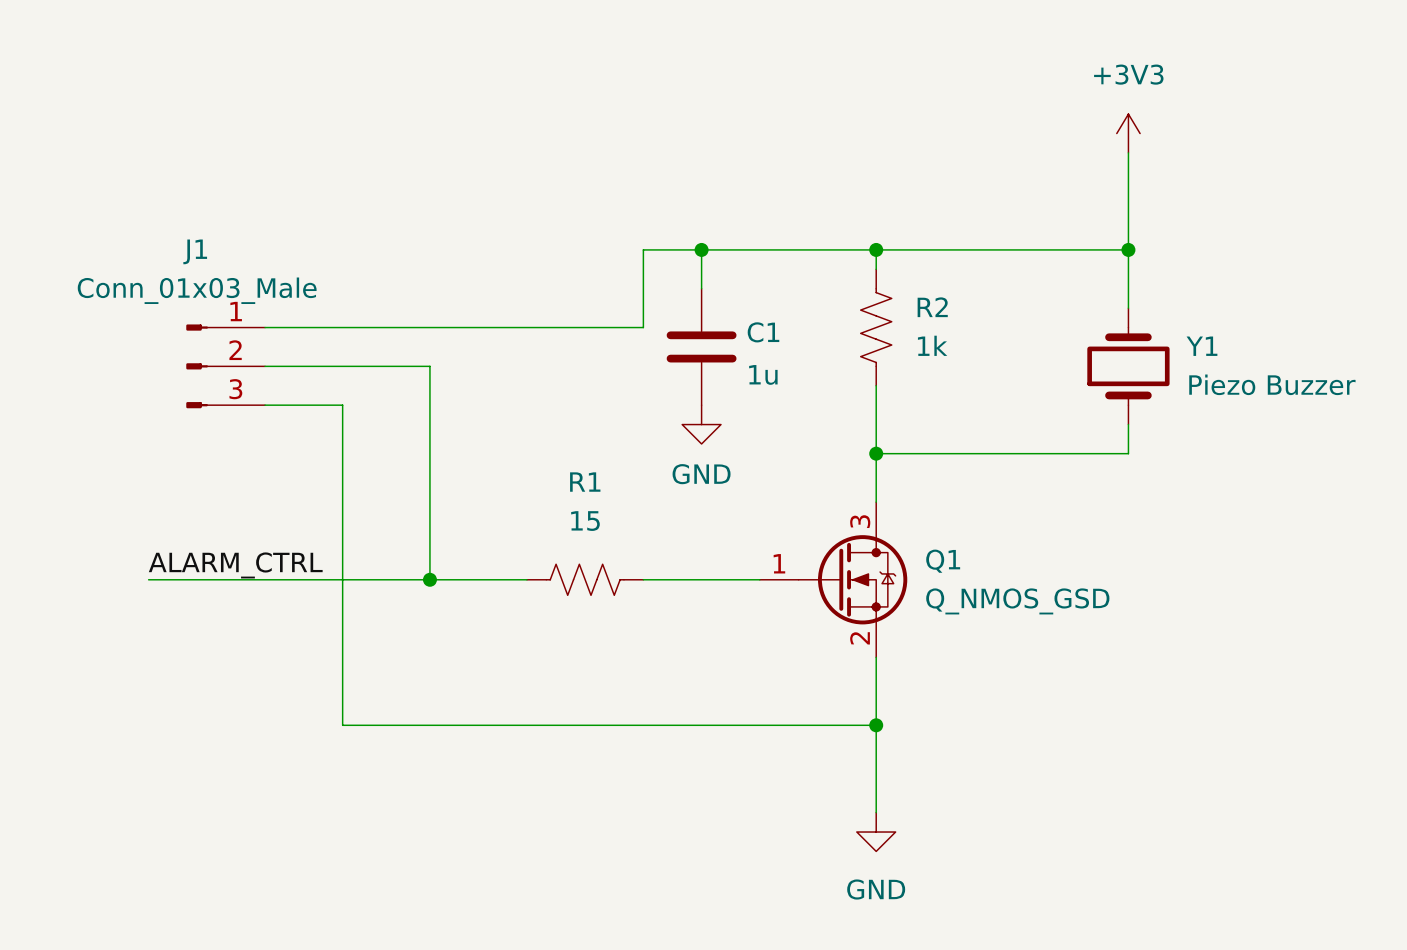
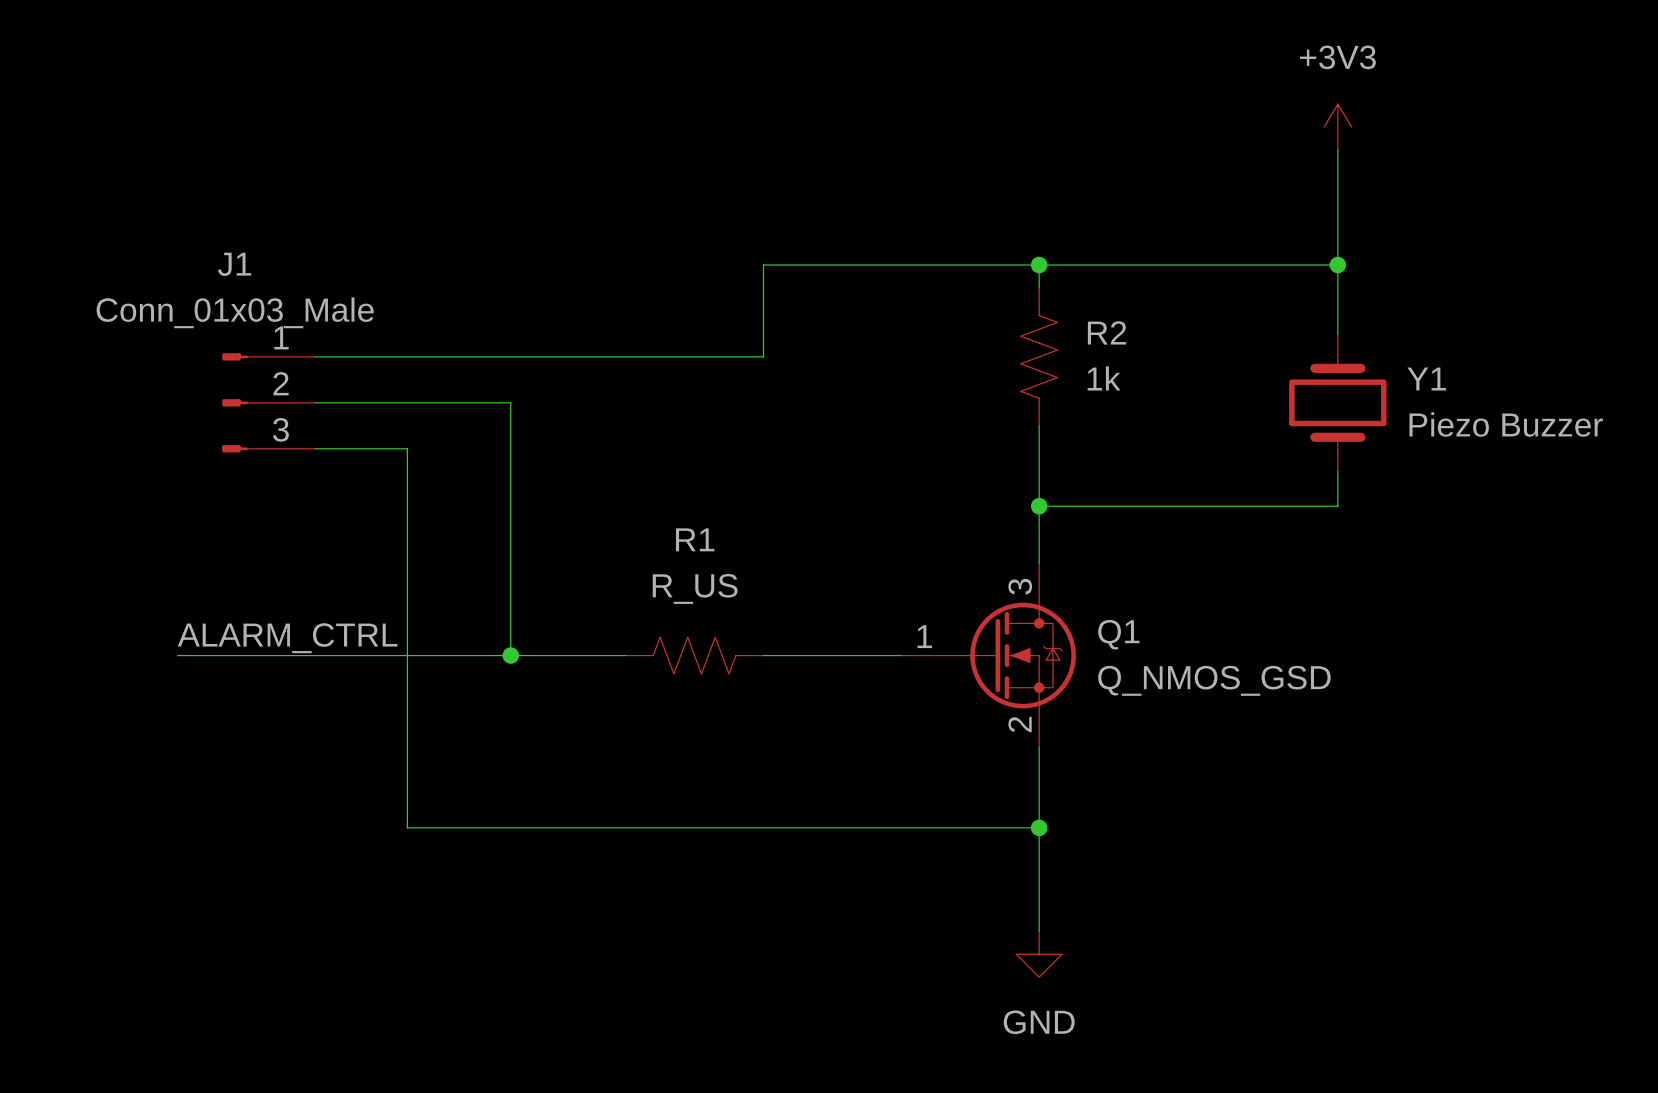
wire: (701, 249) (701, 288) -> none
junction: (701, 249) -> none
C1: 1u (701, 346) -> none
power symbol: GND (701, 424) -> none
R1 value: 15 (585, 521) -> R_US (695, 588)

